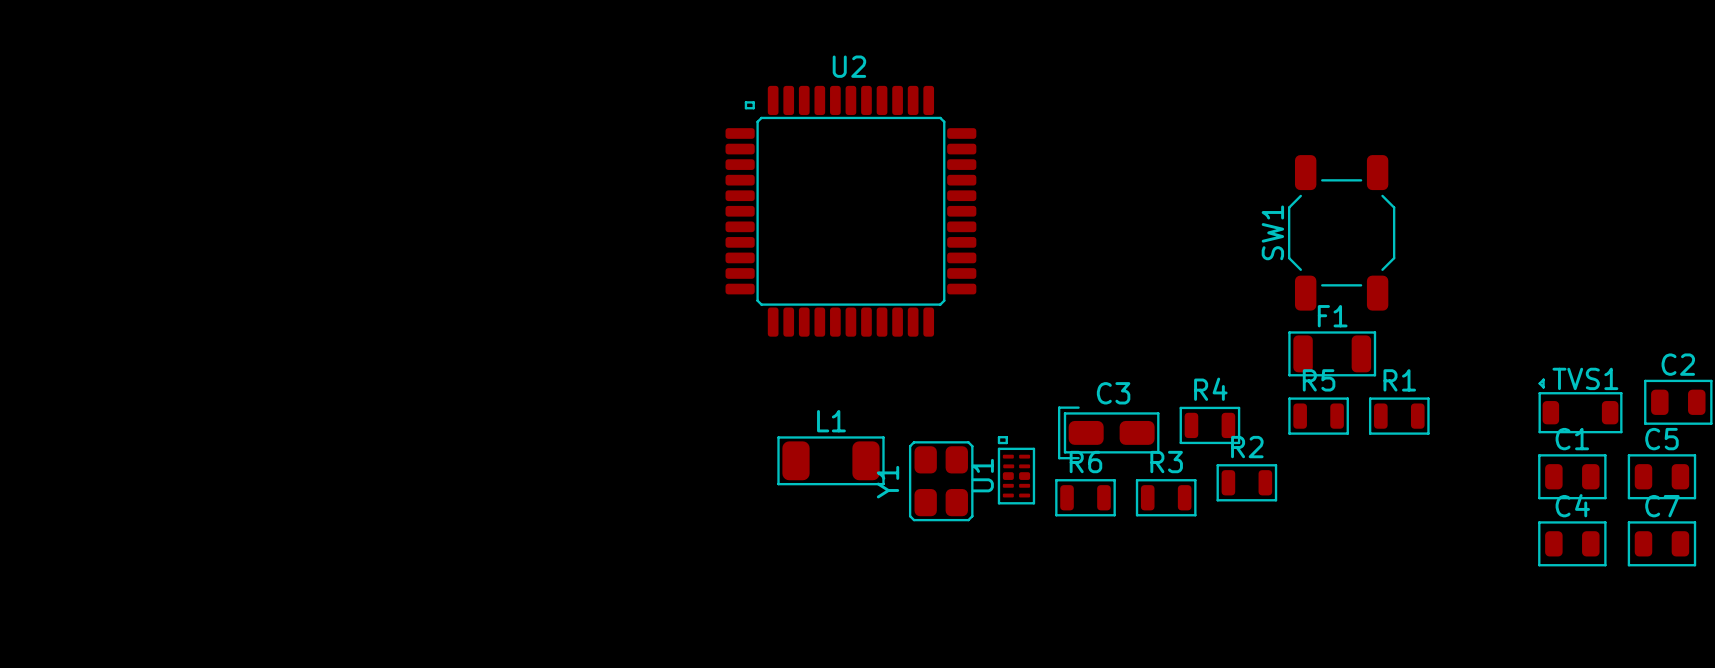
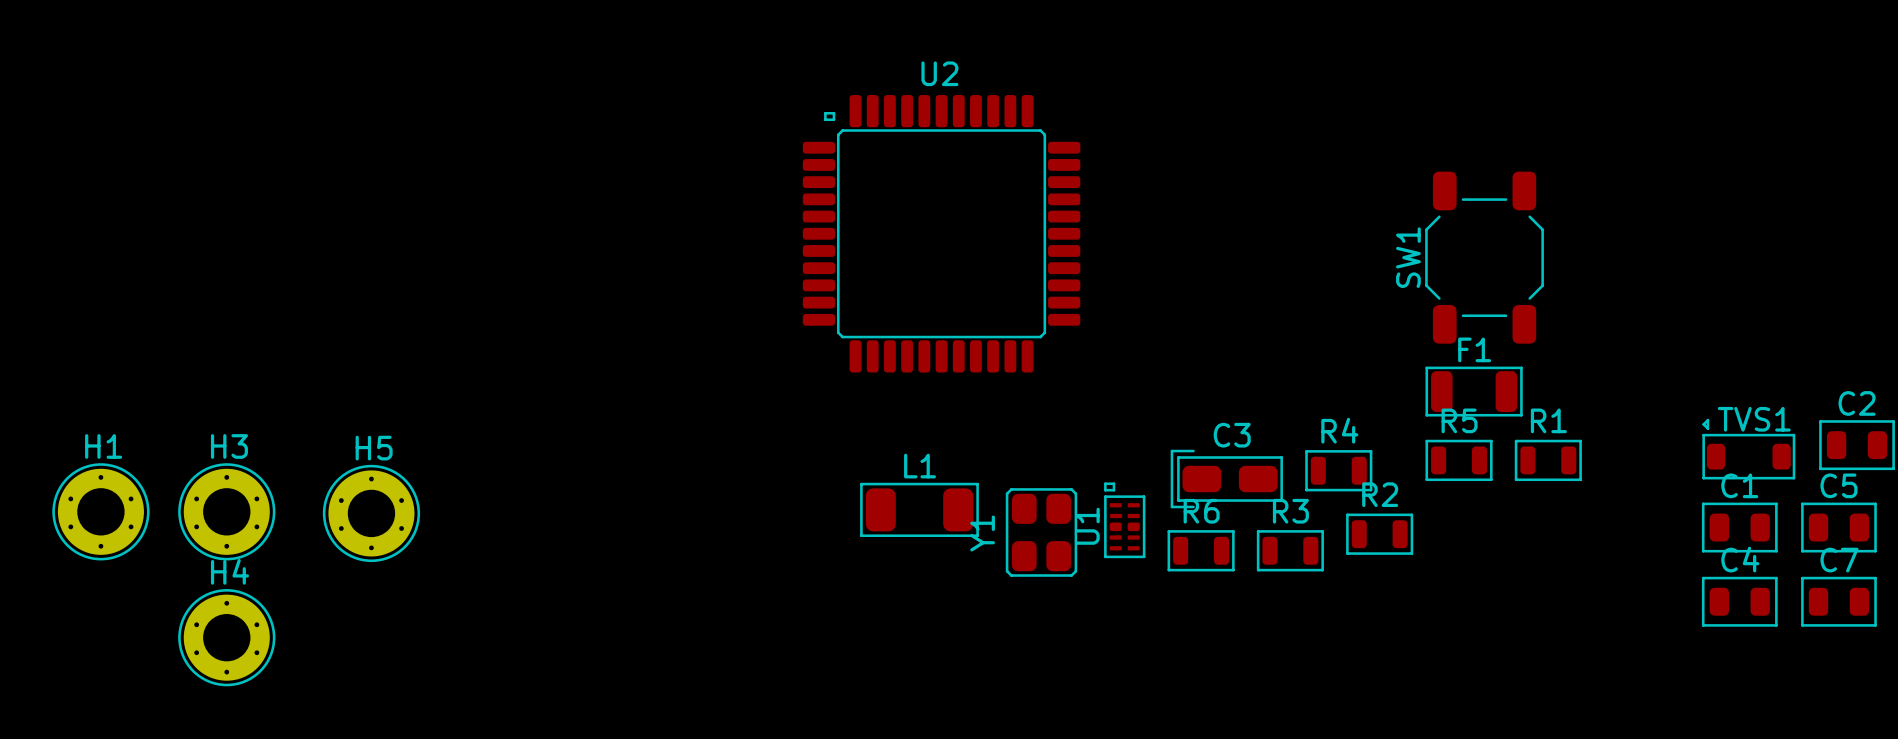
H1: none -> (100, 511)
H3: none -> (226, 511)
H5: none -> (371, 513)
H4: none -> (226, 637)

